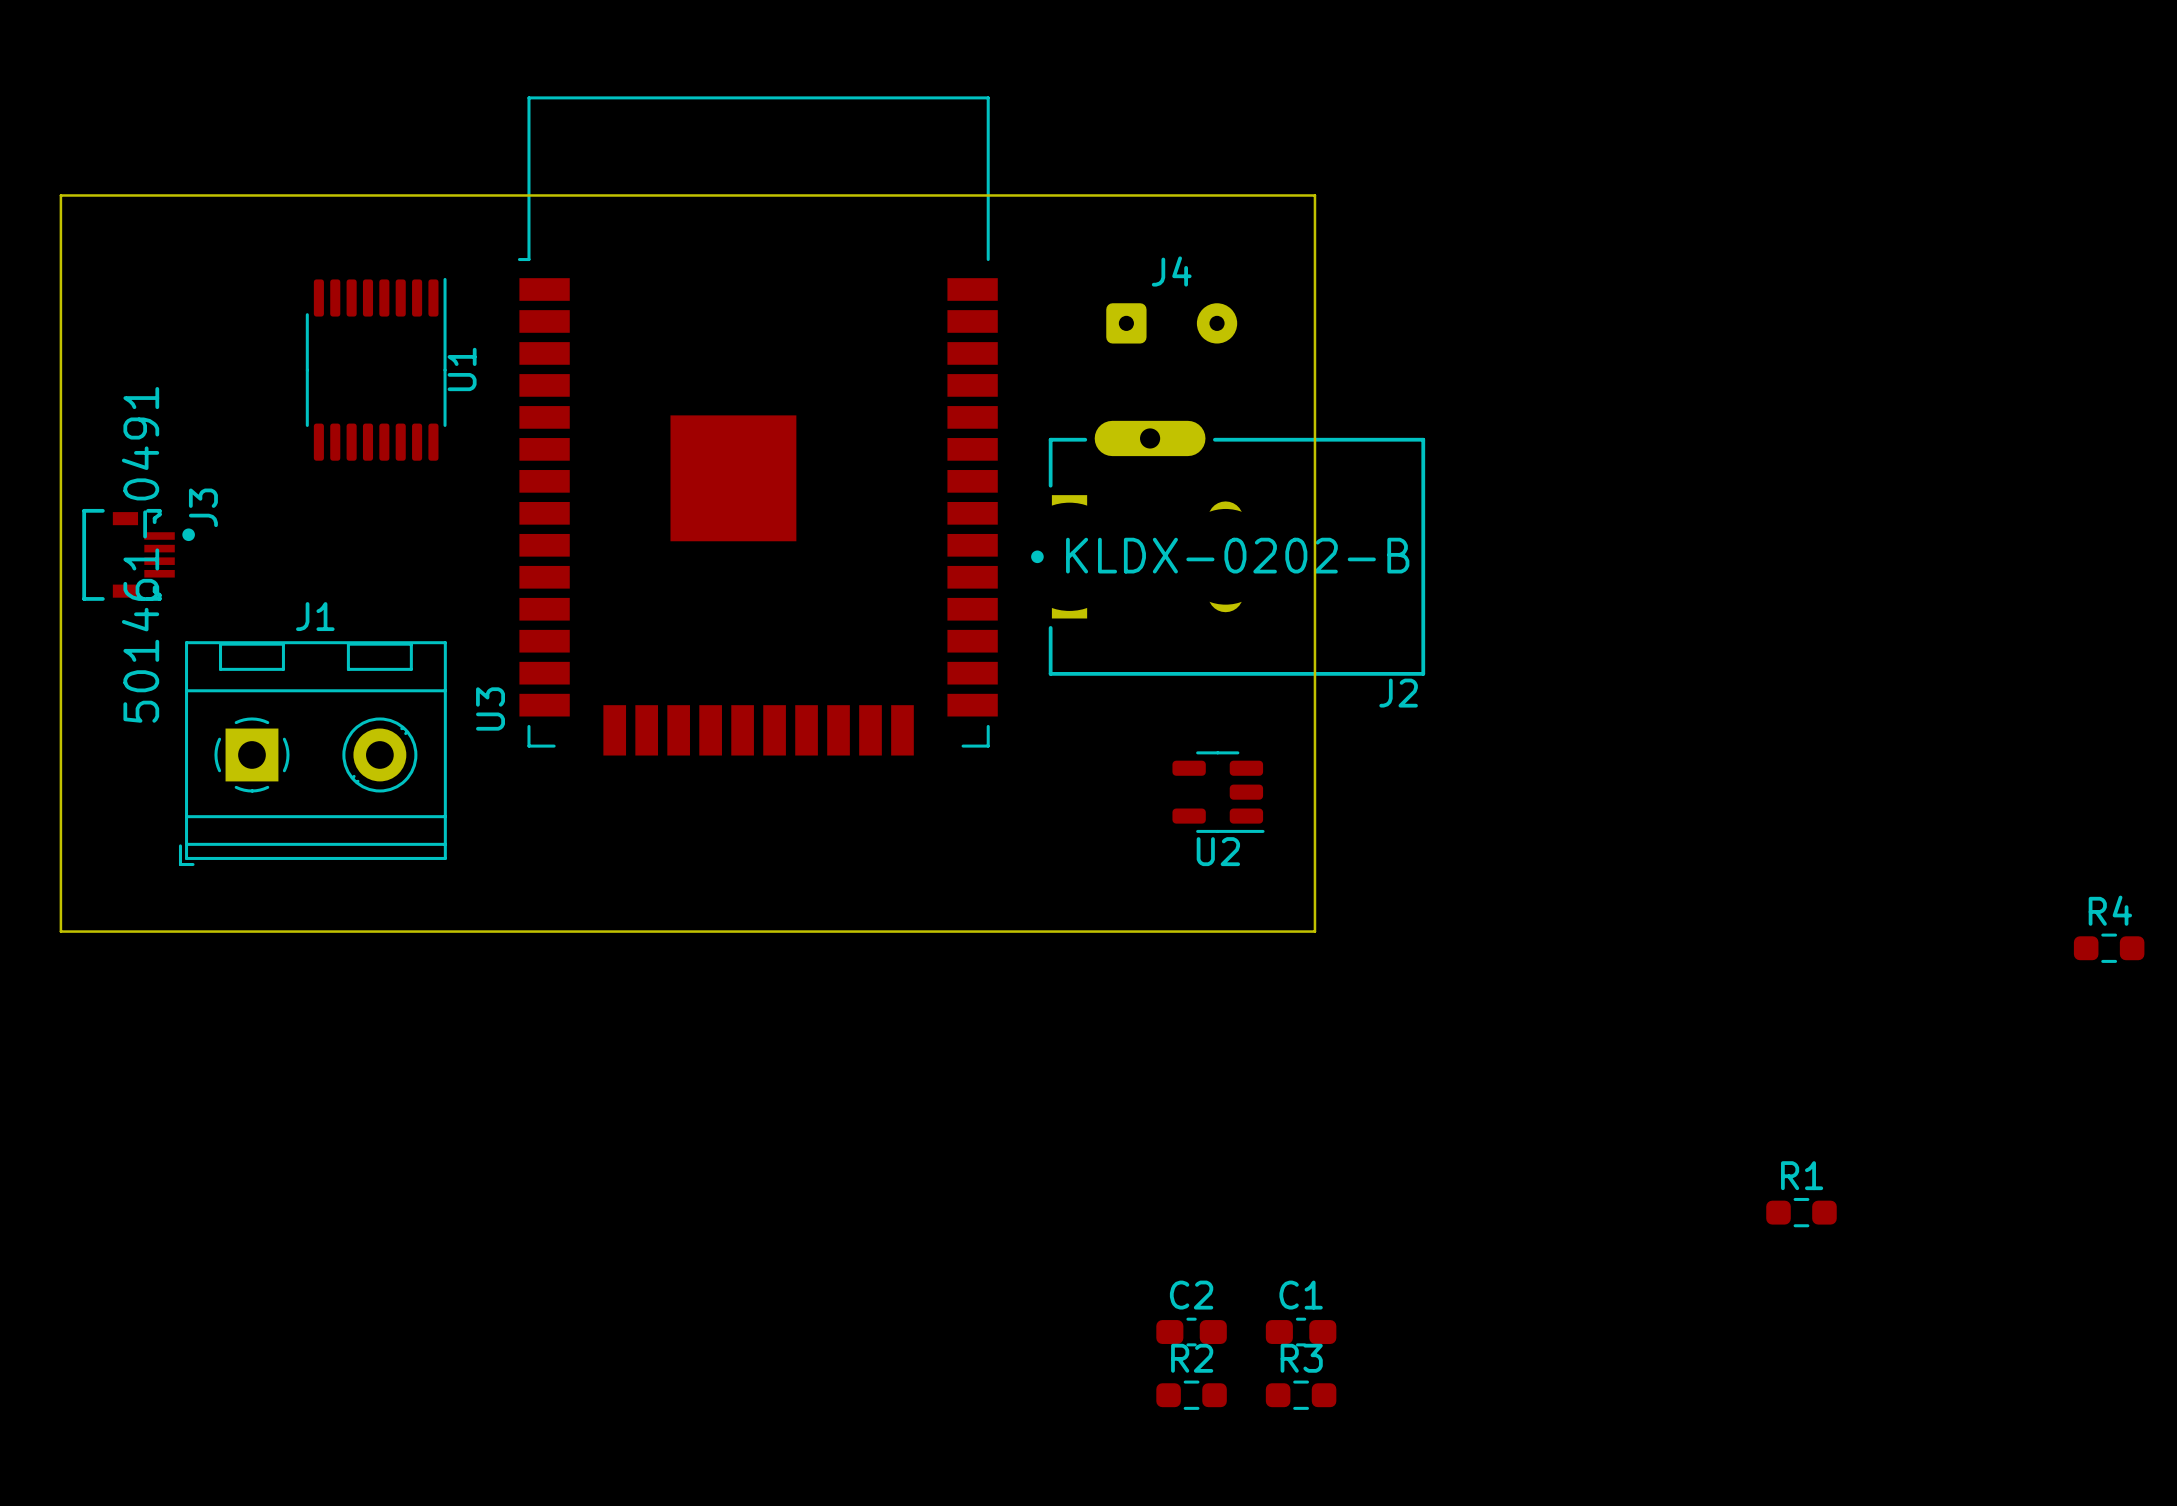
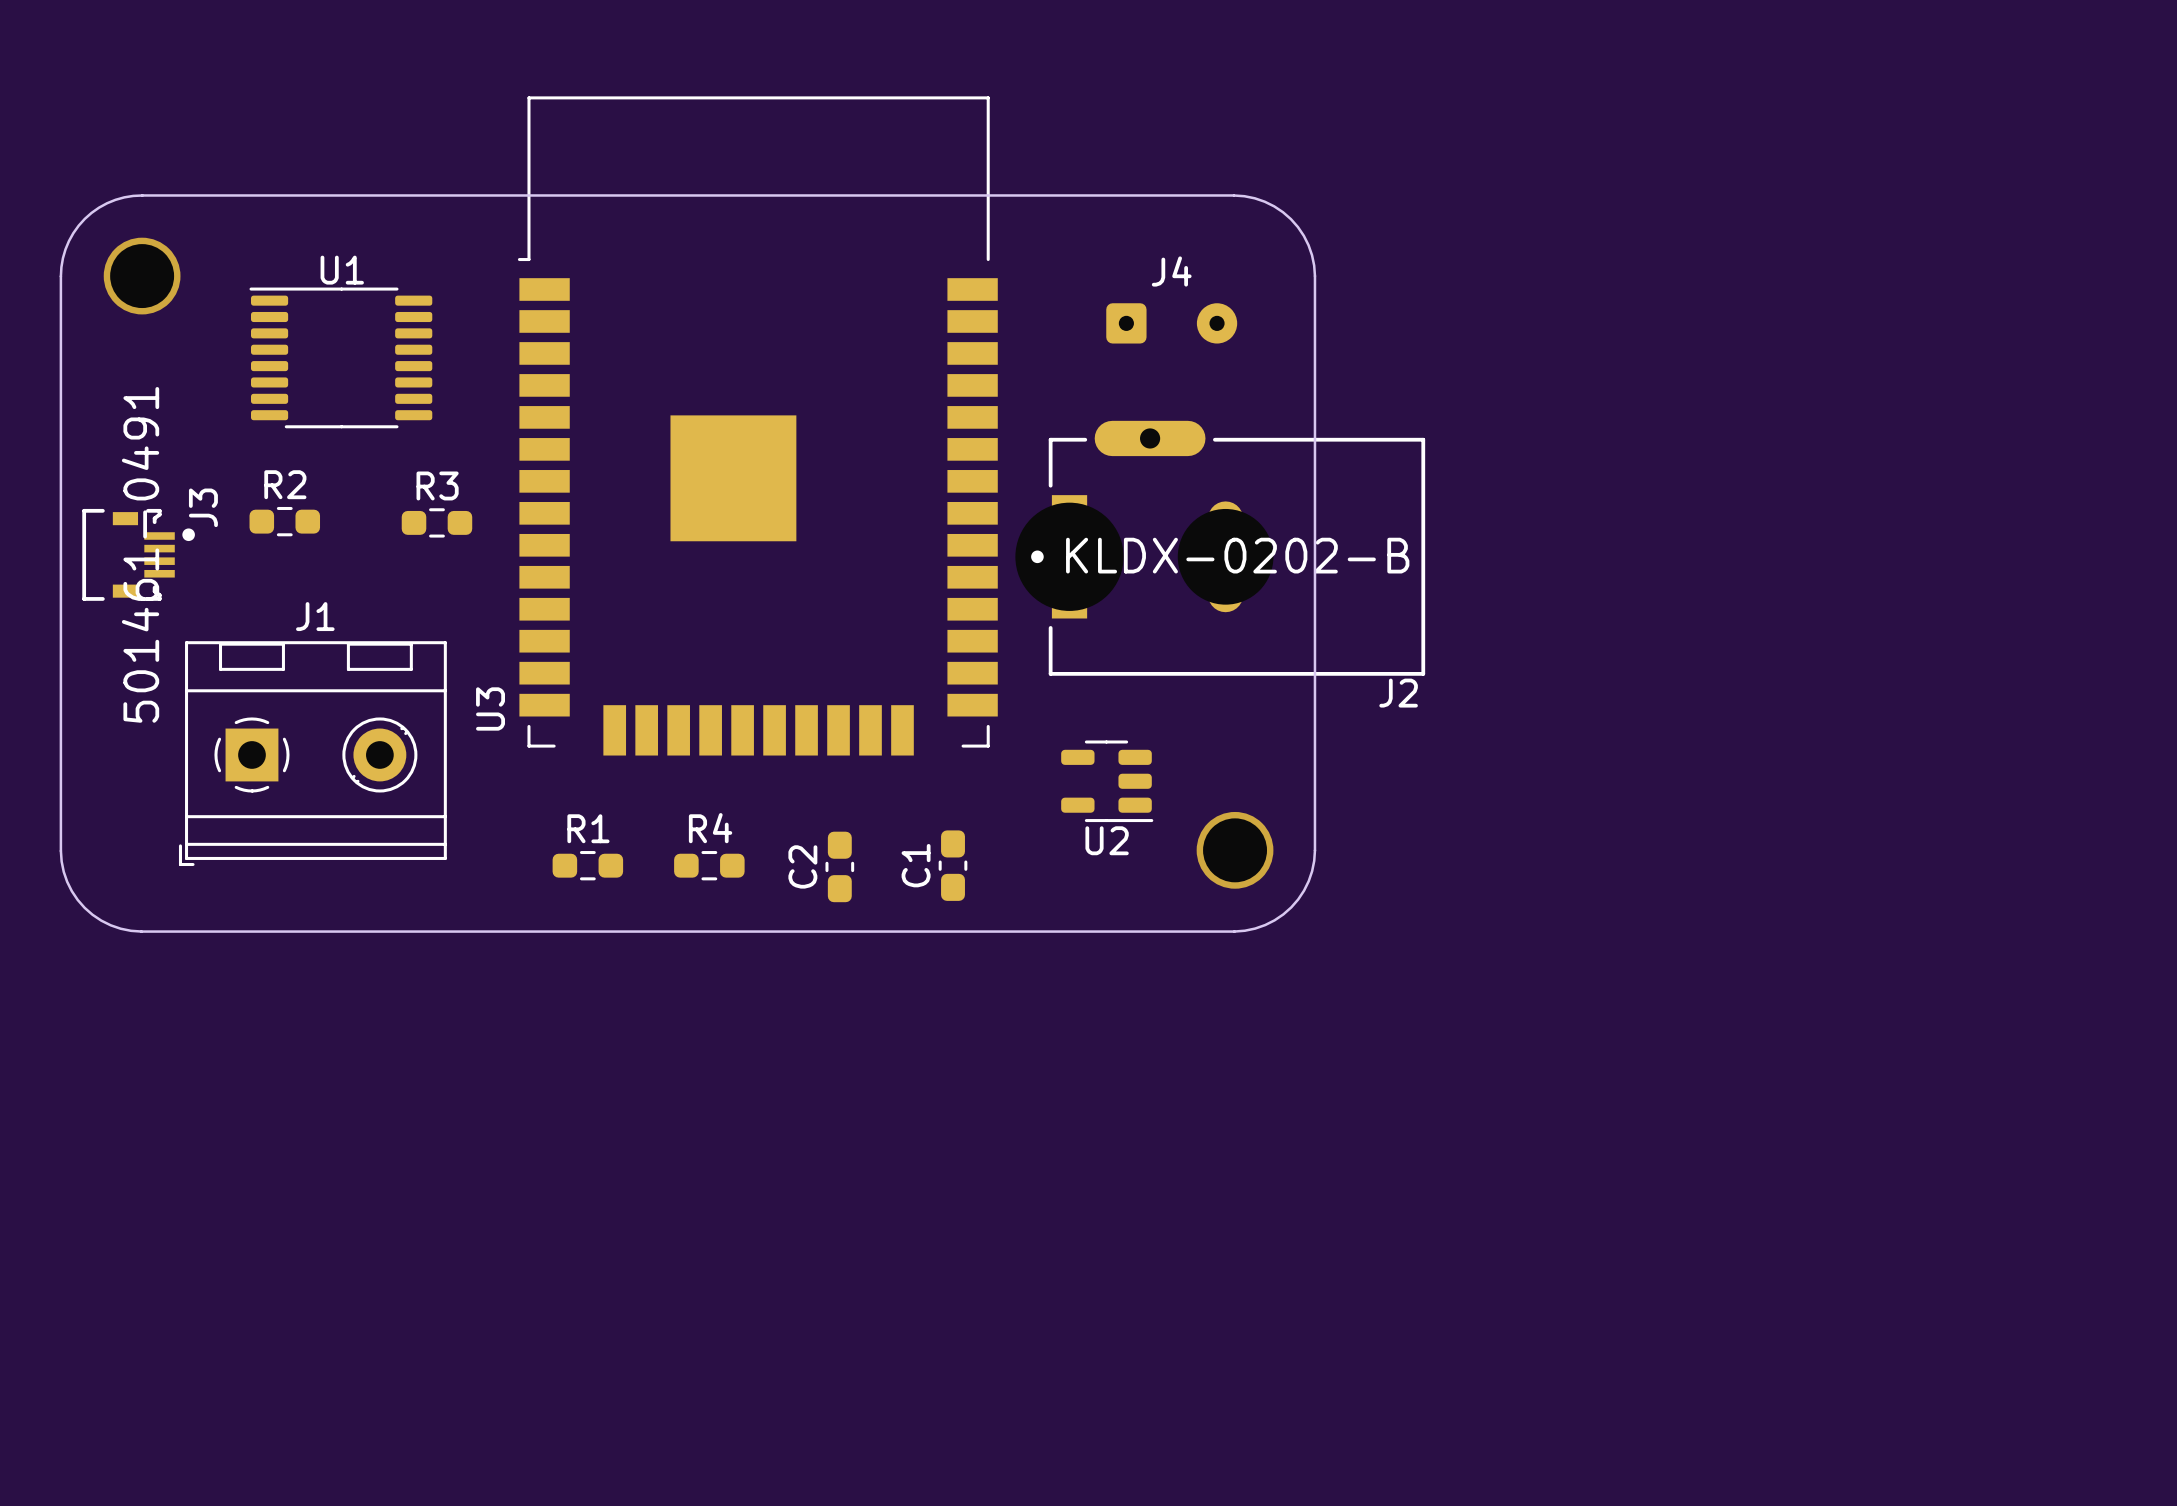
board edge: (142, 195) (60, 195) (60, 276) -> (142, 195) (124, 197) (107, 203) (84, 218) (73, 233) (65, 249) (60, 276)
board edge: (1233, 195) (1314, 195) (1314, 276) -> (1233, 195) (1264, 201) (1290, 219) (1308, 245) (1314, 276)
via: none -> (142, 276)
U1 rotation: 0° (376, 369) -> 90° counterclockwise (340, 357)
U2 position: (1218, 792) -> (1107, 781)
via: none -> (1235, 850)
board edge: (1314, 850) (1314, 931) (1234, 931) -> (1314, 850) (1308, 881) (1291, 907) (1265, 925) (1234, 931)
board edge: (60, 851) (60, 931) (141, 931) -> (60, 851) (67, 881) (84, 907) (110, 925) (141, 931)
R4 position: (2109, 948) -> (709, 865)
R1 position: (1801, 1212) -> (587, 865)
C2 name position: C2 (1191, 1295) -> C2 (802, 866)
C1 name position: C1 (1301, 1295) -> C1 (916, 865)
C2 rotation: 0° (1191, 1332) -> 90° clockwise (839, 866)
C2 position: (1191, 1332) -> (839, 866)
C1 rotation: 0° (1301, 1332) -> 90° clockwise (953, 865)
C1 position: (1301, 1332) -> (953, 865)
R2 position: (1191, 1395) -> (284, 521)
R3 position: (1301, 1395) -> (436, 522)

